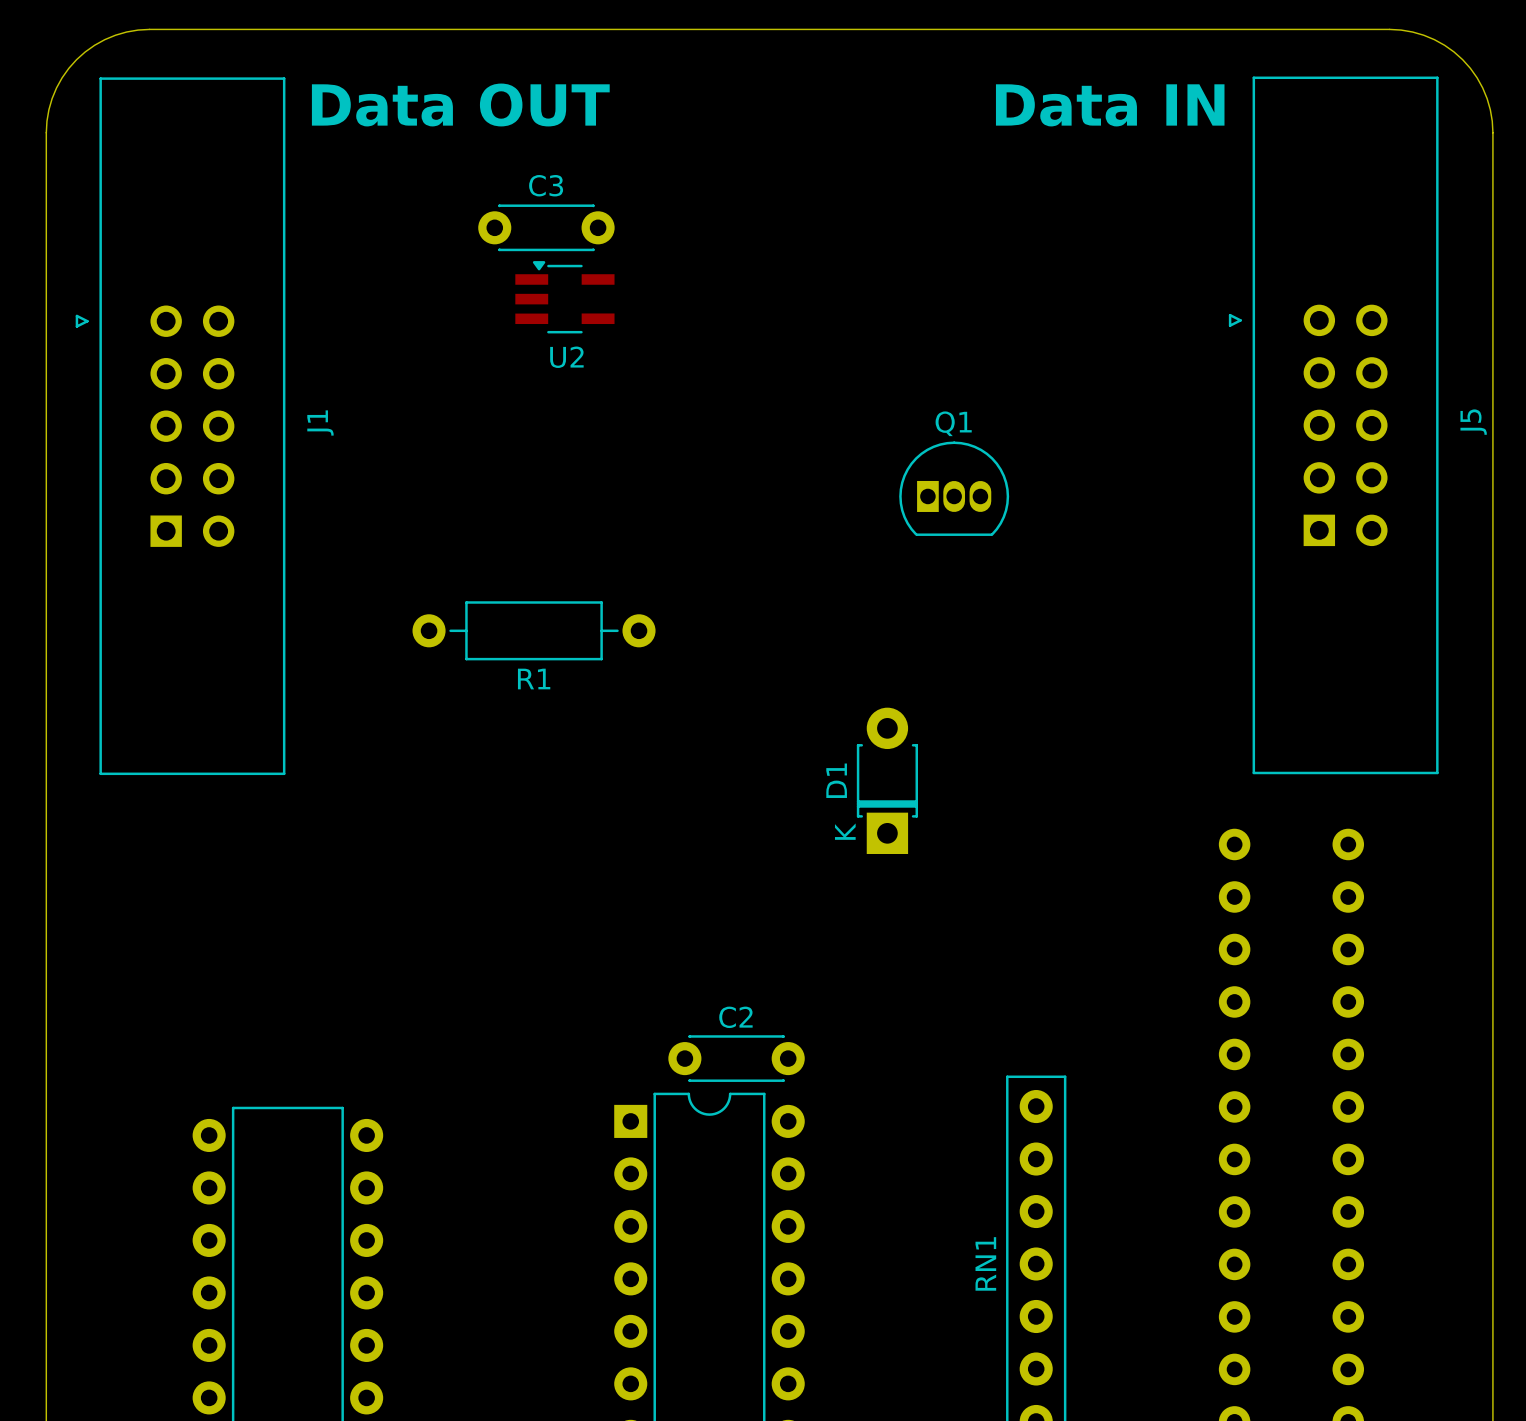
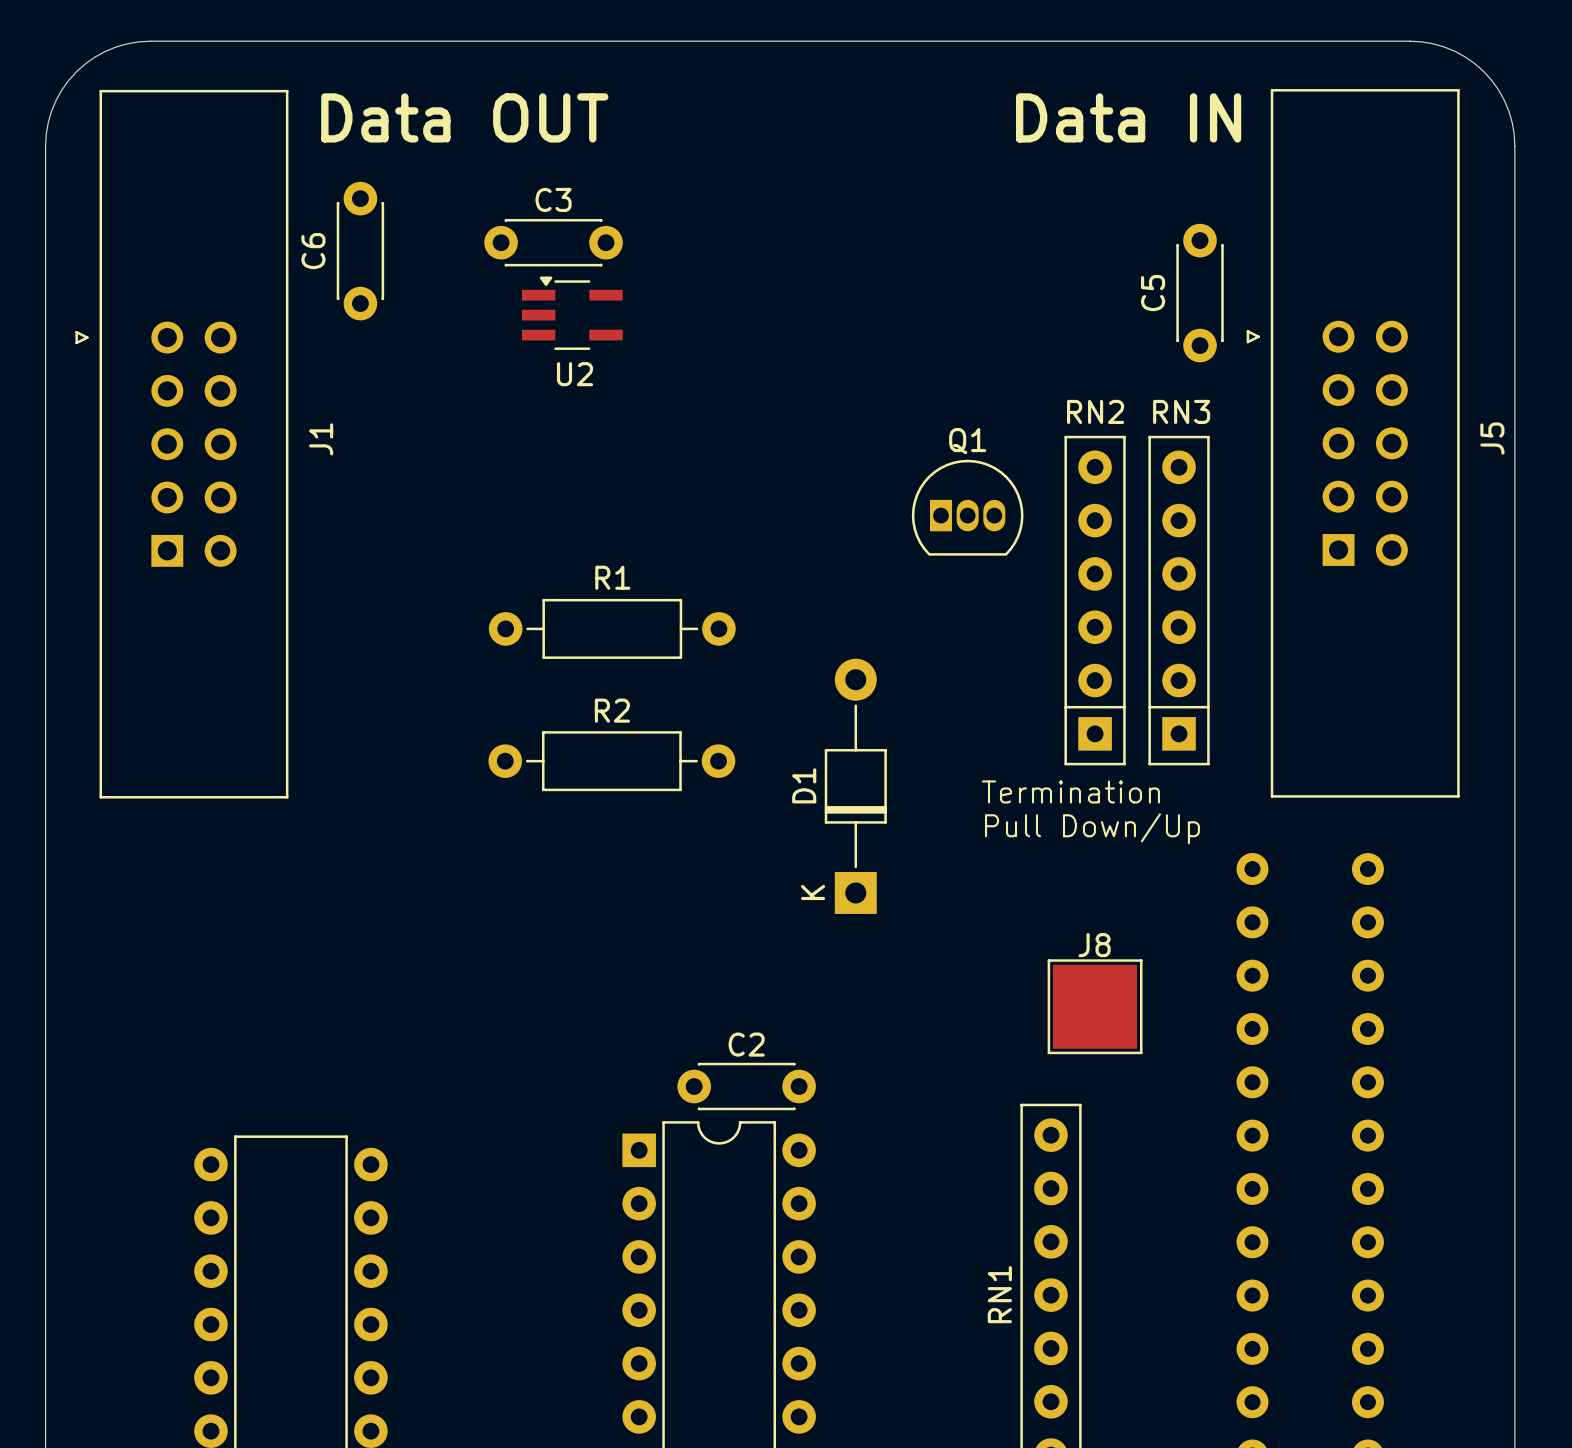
C6: none -> (360, 251)
C5: none -> (1200, 293)
RN2: none -> (1095, 600)
RN3: none -> (1179, 600)
R1 position: (534, 630) -> (612, 628)
R1 name position: R1 (534, 679) -> R1 (612, 577)
D1 footprint: [856, 707, 919, 854] -> [824, 658, 887, 914]
R2: none -> (611, 761)
text: none -> Termination (1070, 791)
text: none -> Pull Down/Up (1092, 828)
J8: none -> (1095, 1006)

